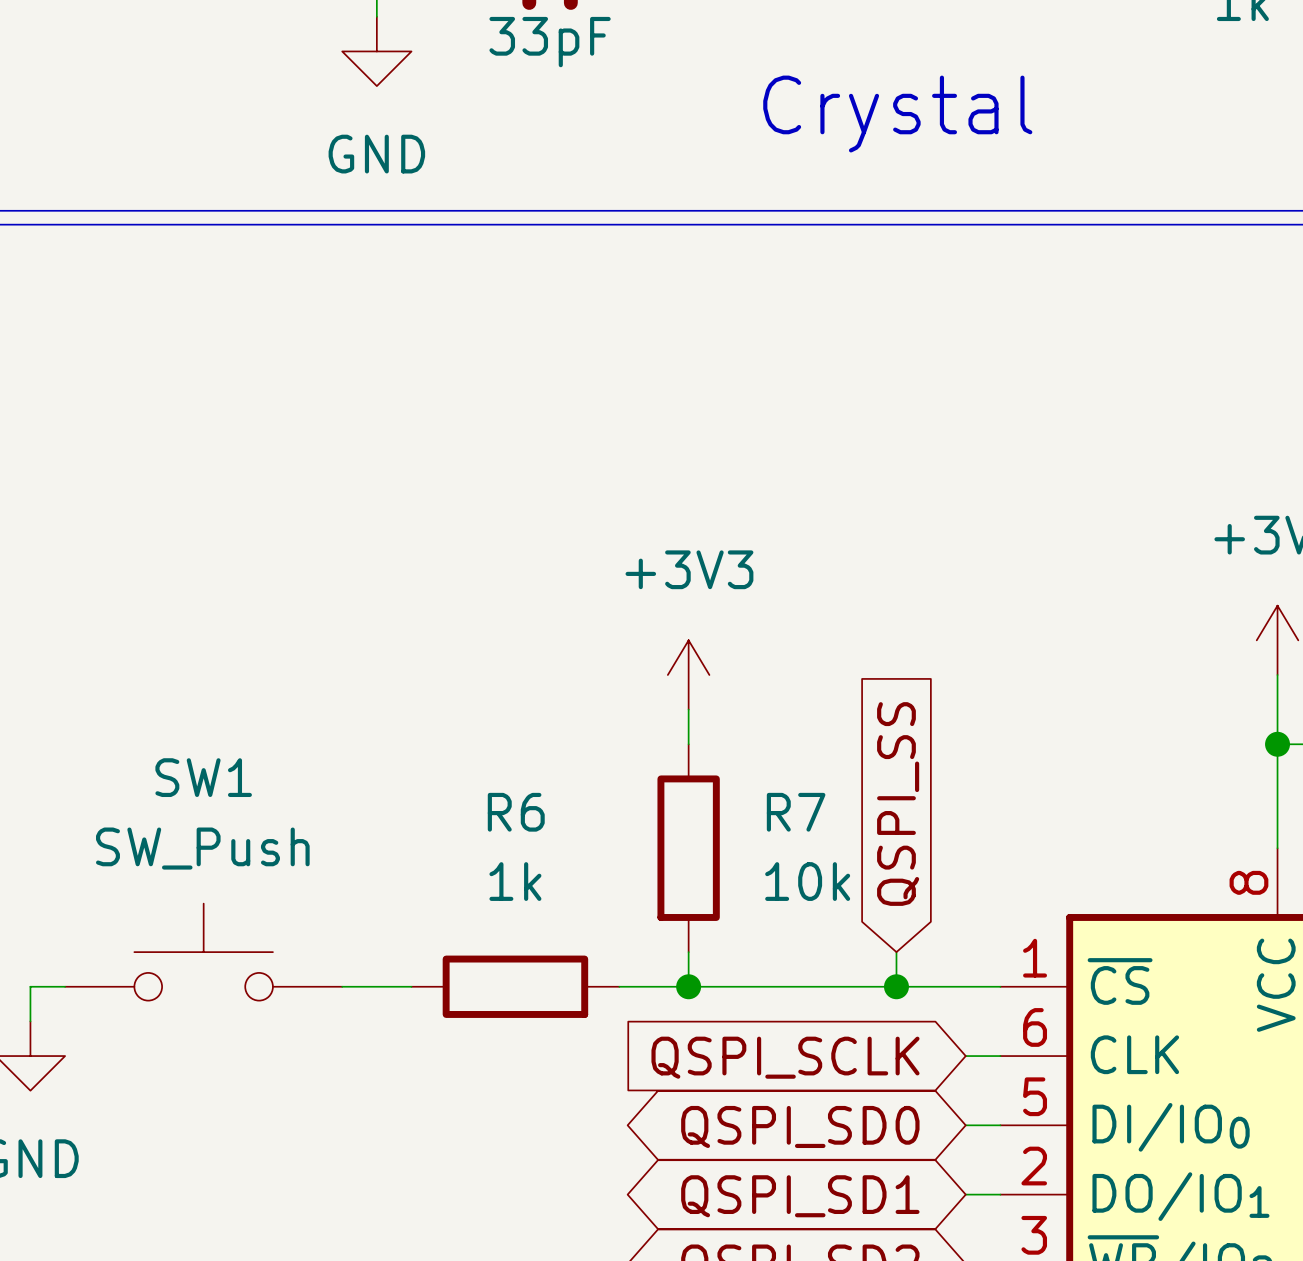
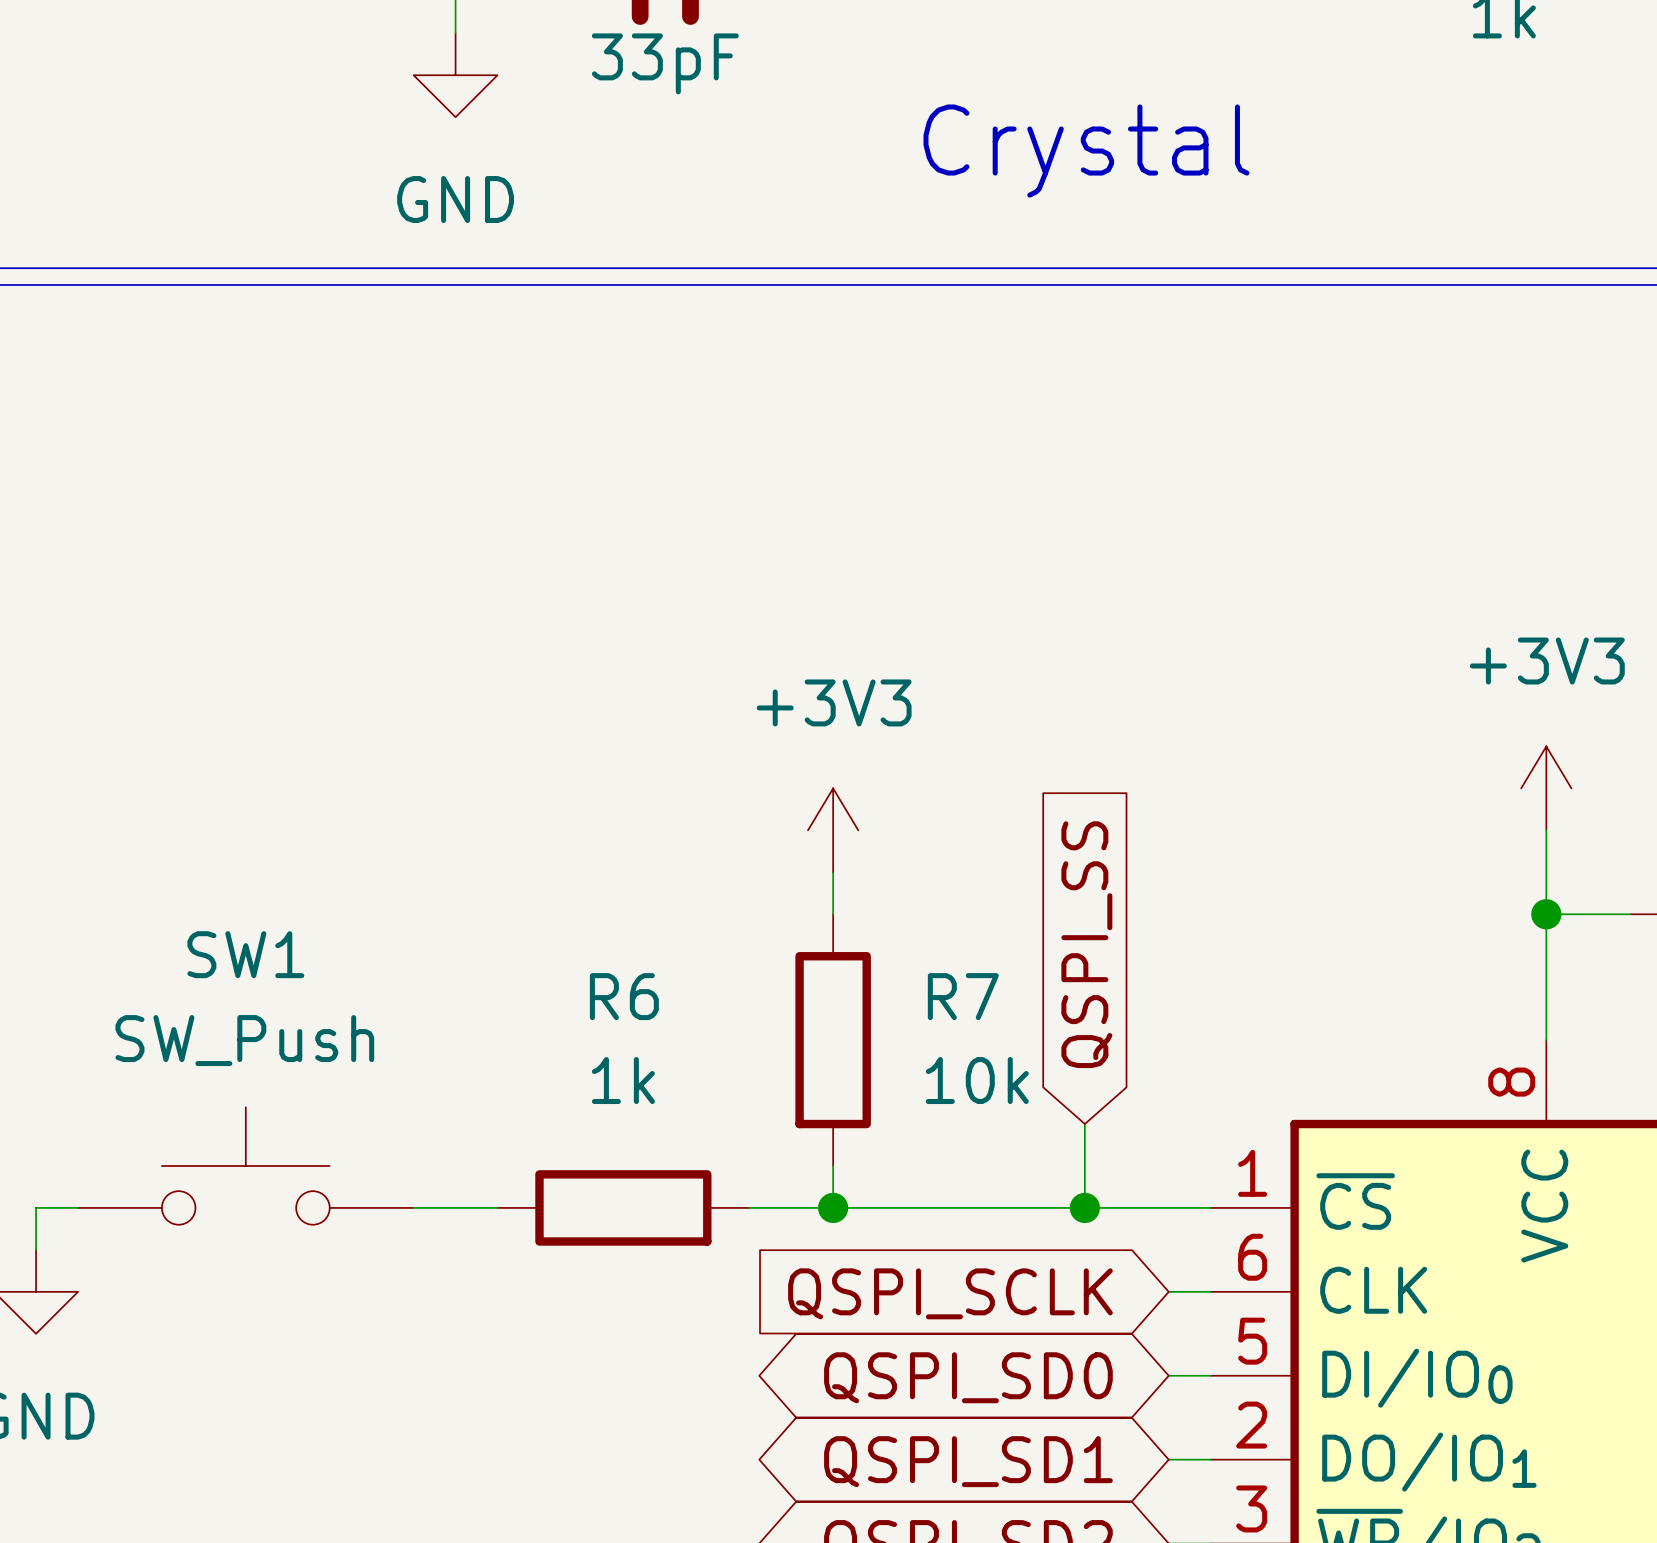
global label position: QSPI_SS (898, 804) -> QSPI_SS (1086, 944)
wire: none -> (1084, 1124) (1084, 1165)

